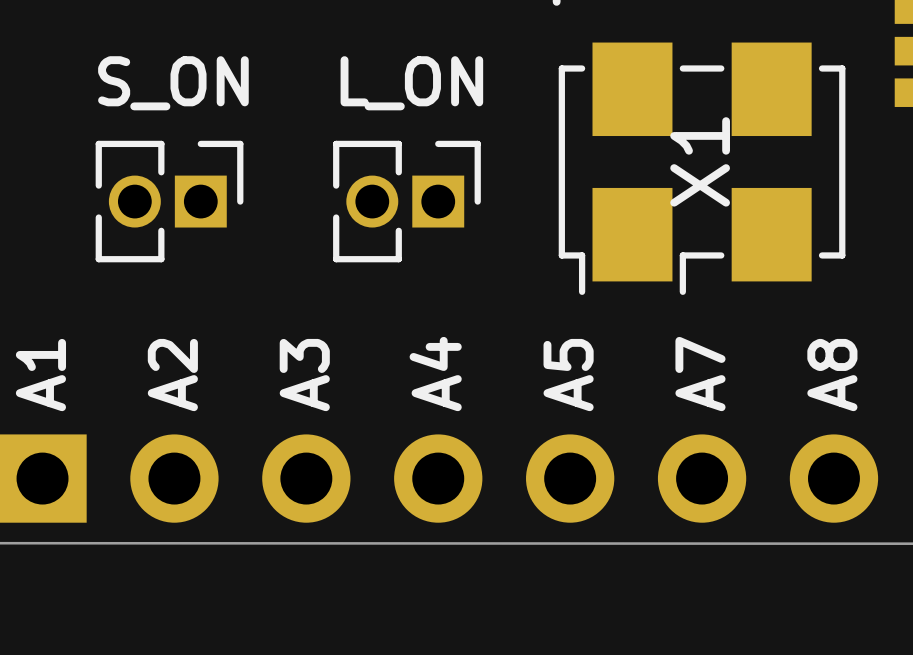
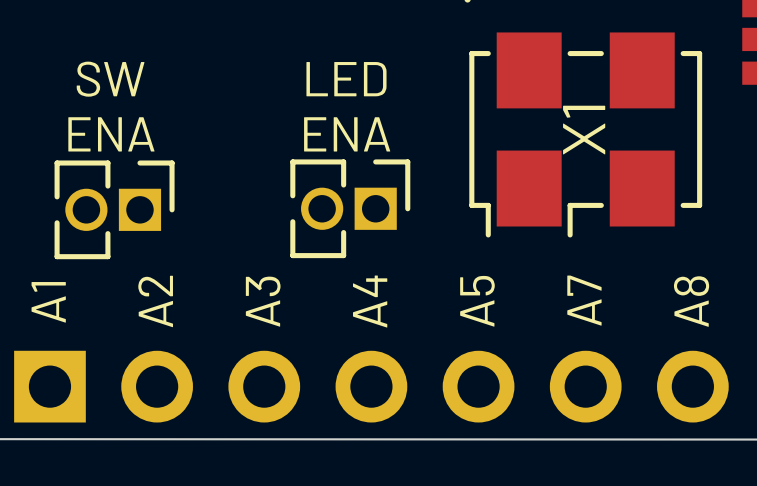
text: S_ON (173, 83) -> none
text: L_ON (411, 83) -> LED (346, 79)
text: none -> SW (110, 79)
text: none -> ENA (111, 134)
text: none -> ENA (347, 134)
part position: (169, 201) -> (114, 209)
part position: (406, 201) -> (350, 208)

